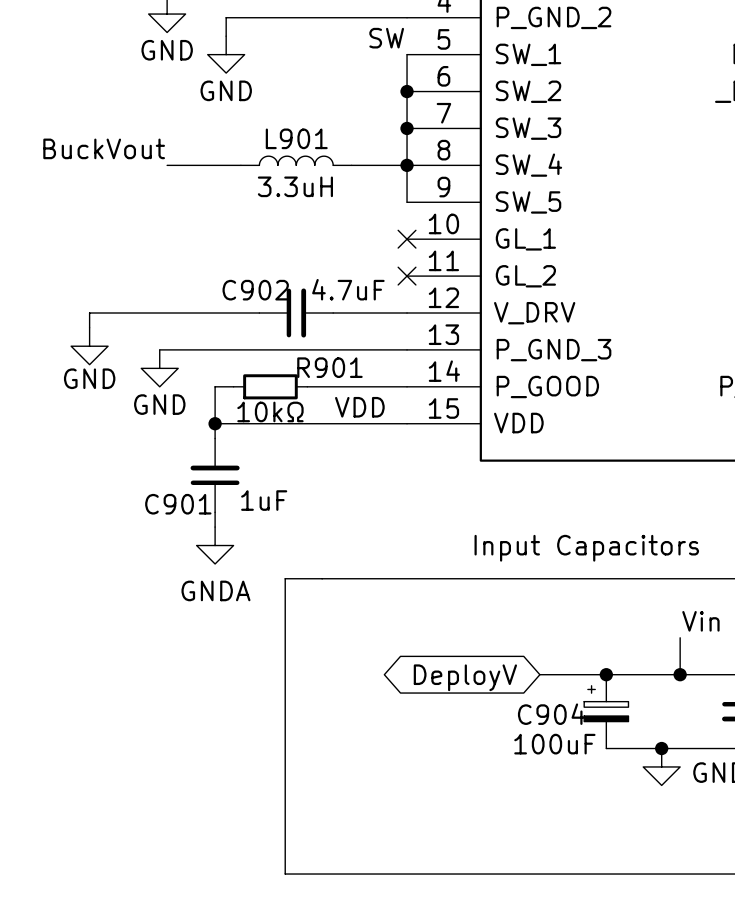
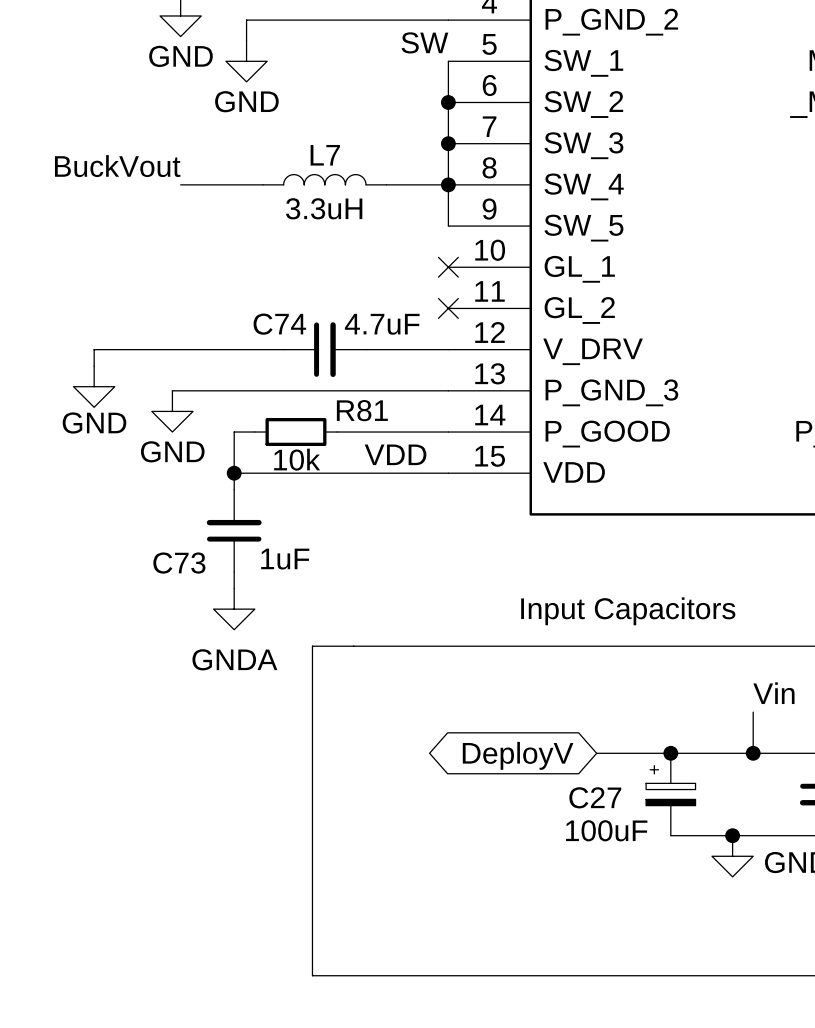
L901 name: L901 (296, 138) -> L7 (325, 155)
C902 name: C902 (255, 290) -> C74 (279, 324)
R901 name: R901 (329, 367) -> R81 (362, 410)
R901 value: 10kΩ (270, 411) -> 10k (297, 459)
C901 name: C901 (178, 504) -> C73 (179, 563)
C904 name: C904 (551, 714) -> C27 (595, 797)

